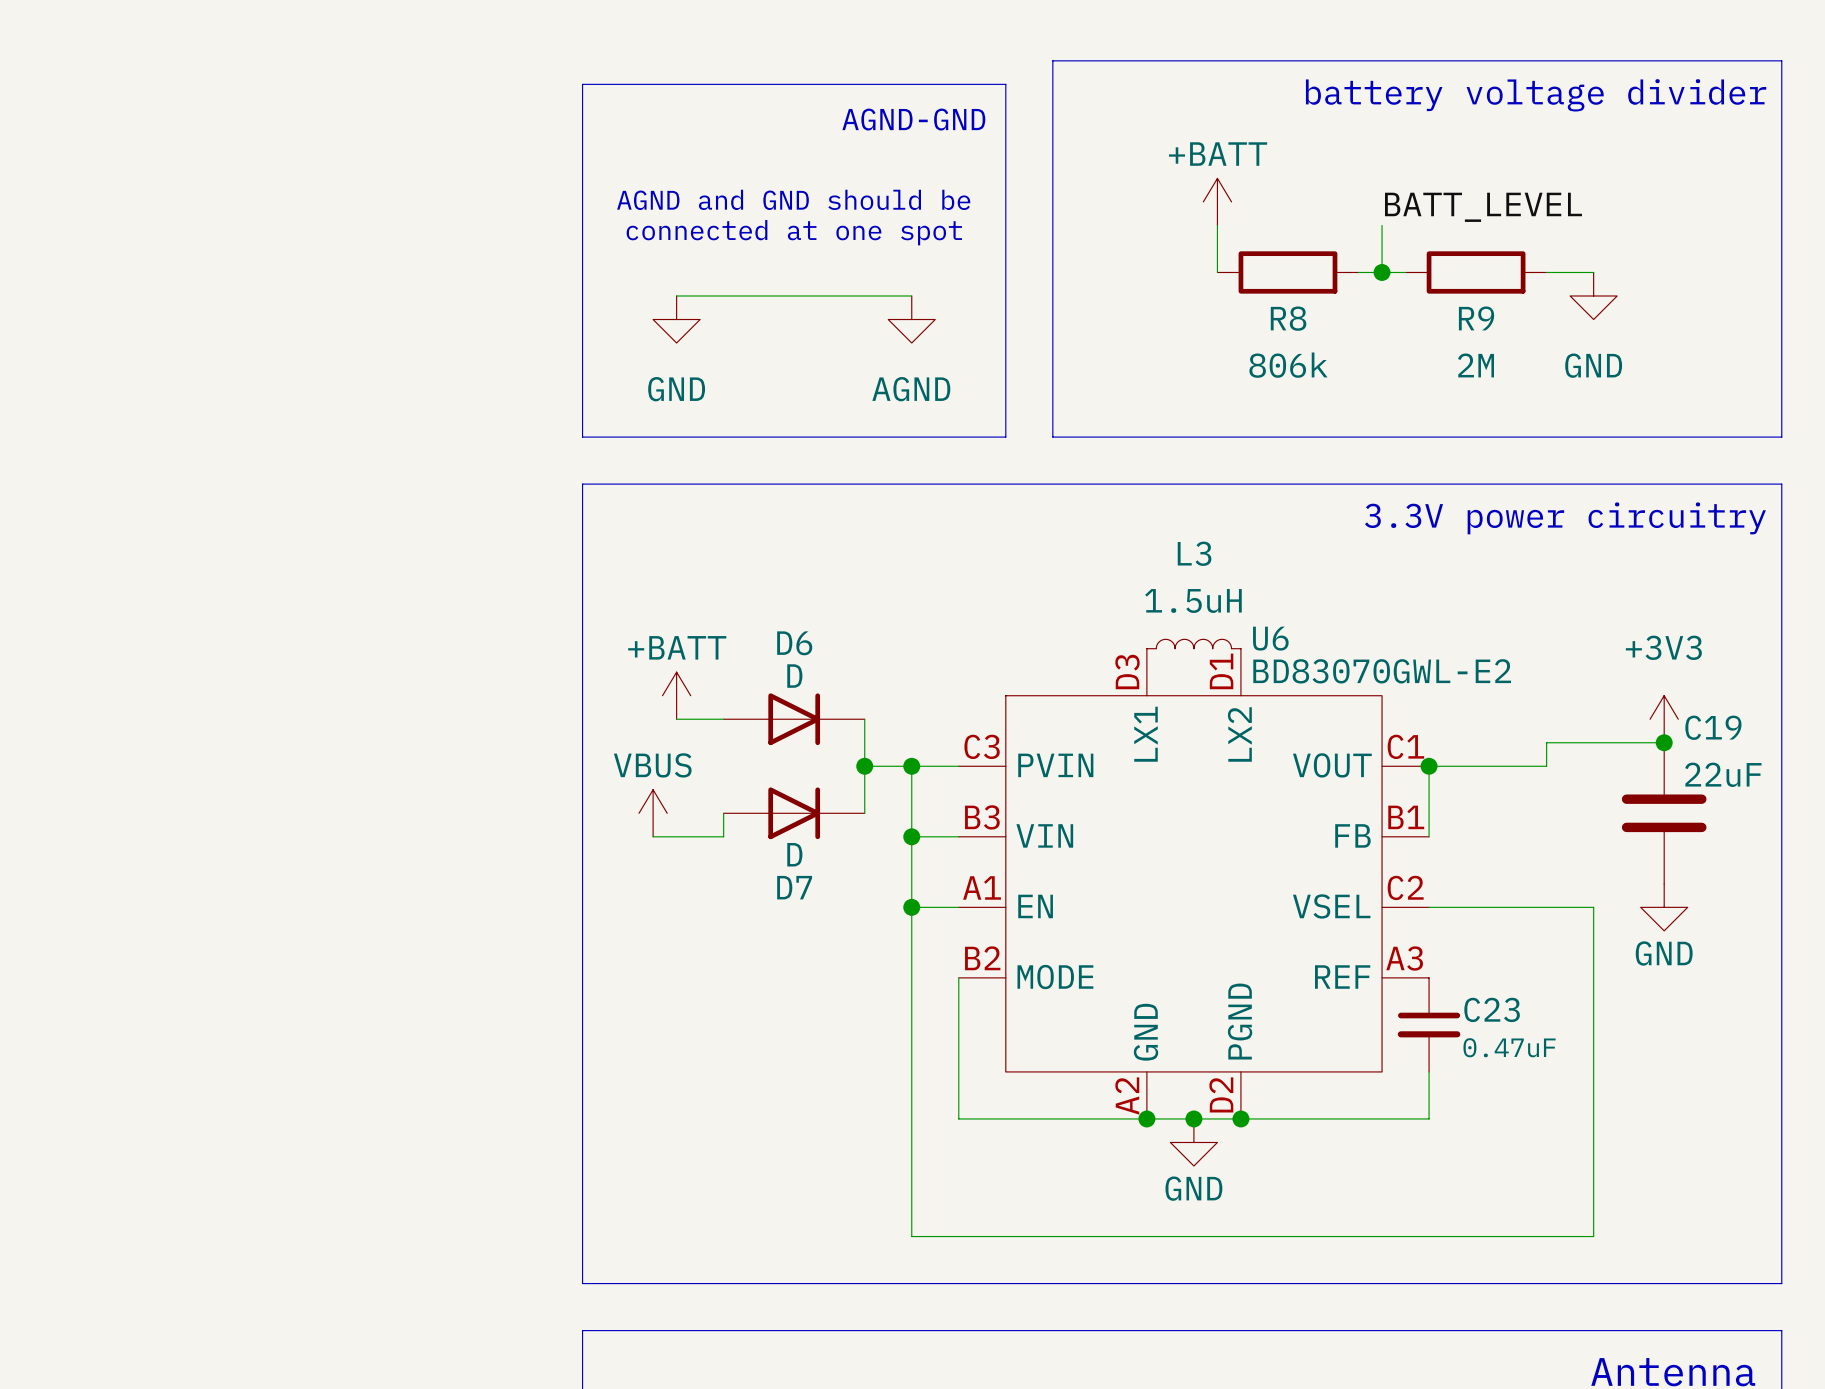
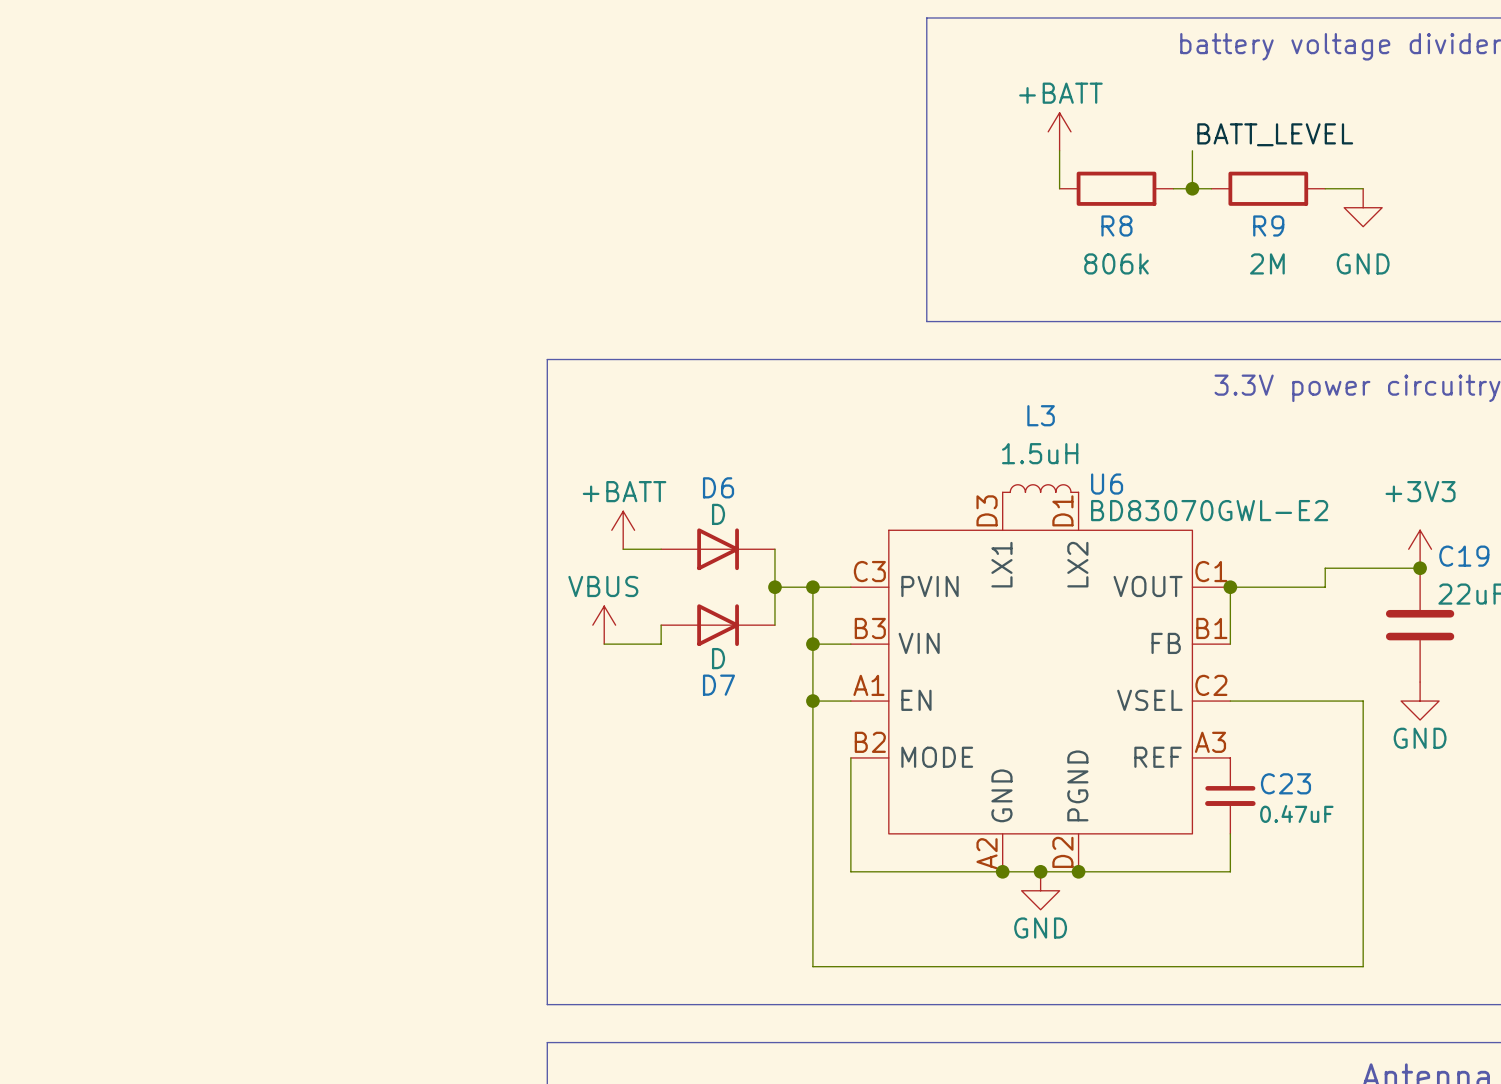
line: (582, 84) (1005, 84) (1005, 437) (582, 437) (582, 84) -> none
text: AGND-GND (913, 119) -> none
text: AGND and GND should be (793, 199) -> none
text: connected at one spot (794, 232) -> none
wire: (676, 295) (911, 295) -> none
power symbol: GND (676, 319) -> none
power symbol: AGND (911, 319) -> none

